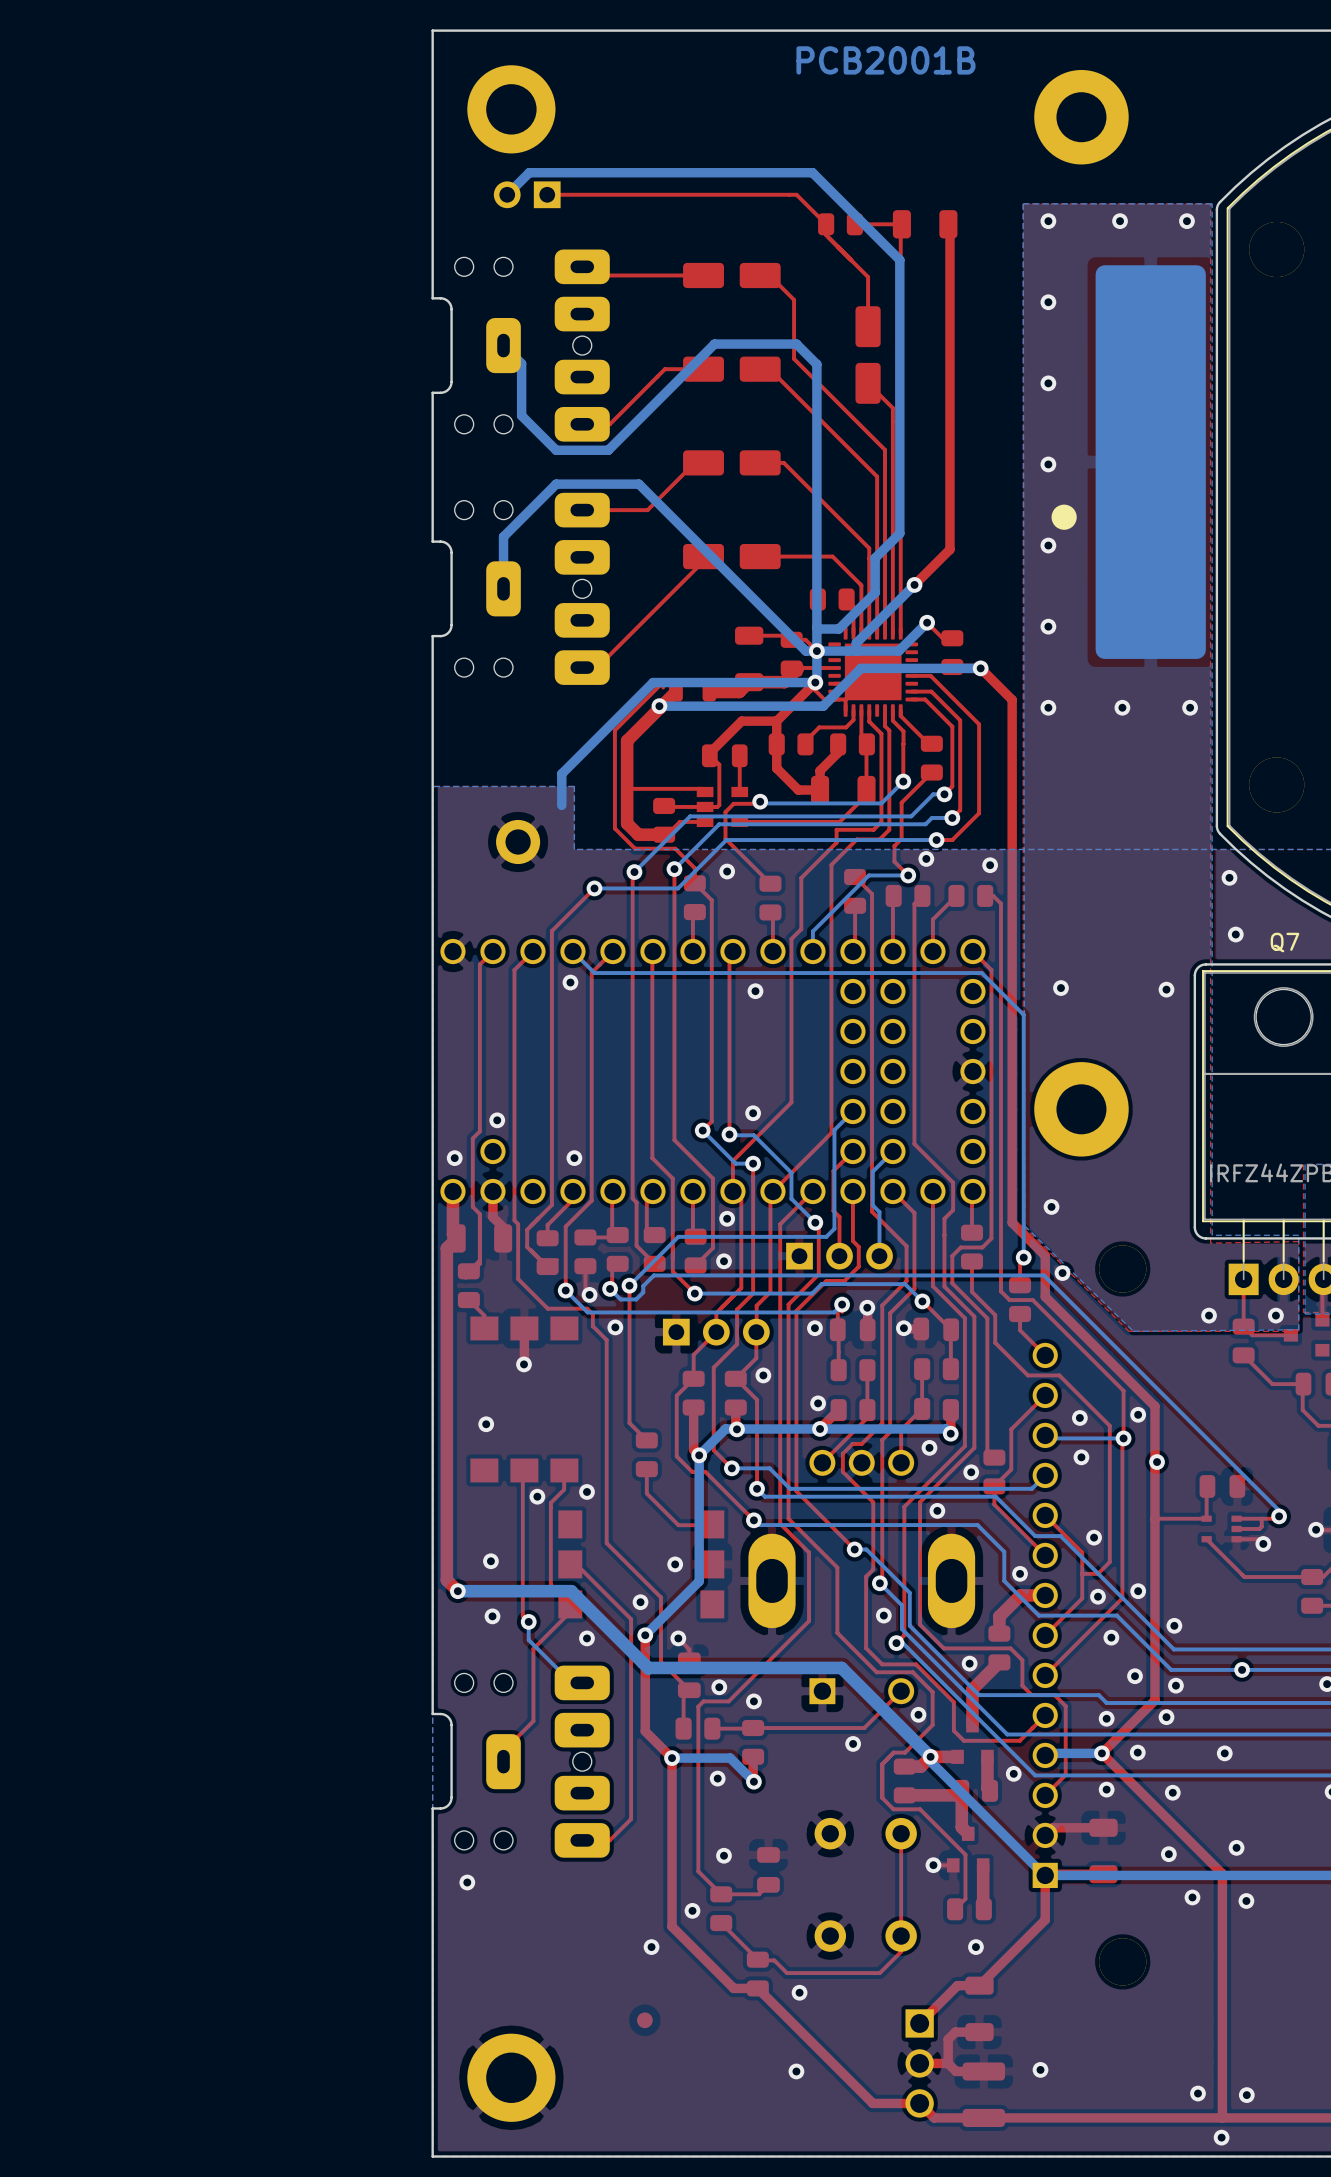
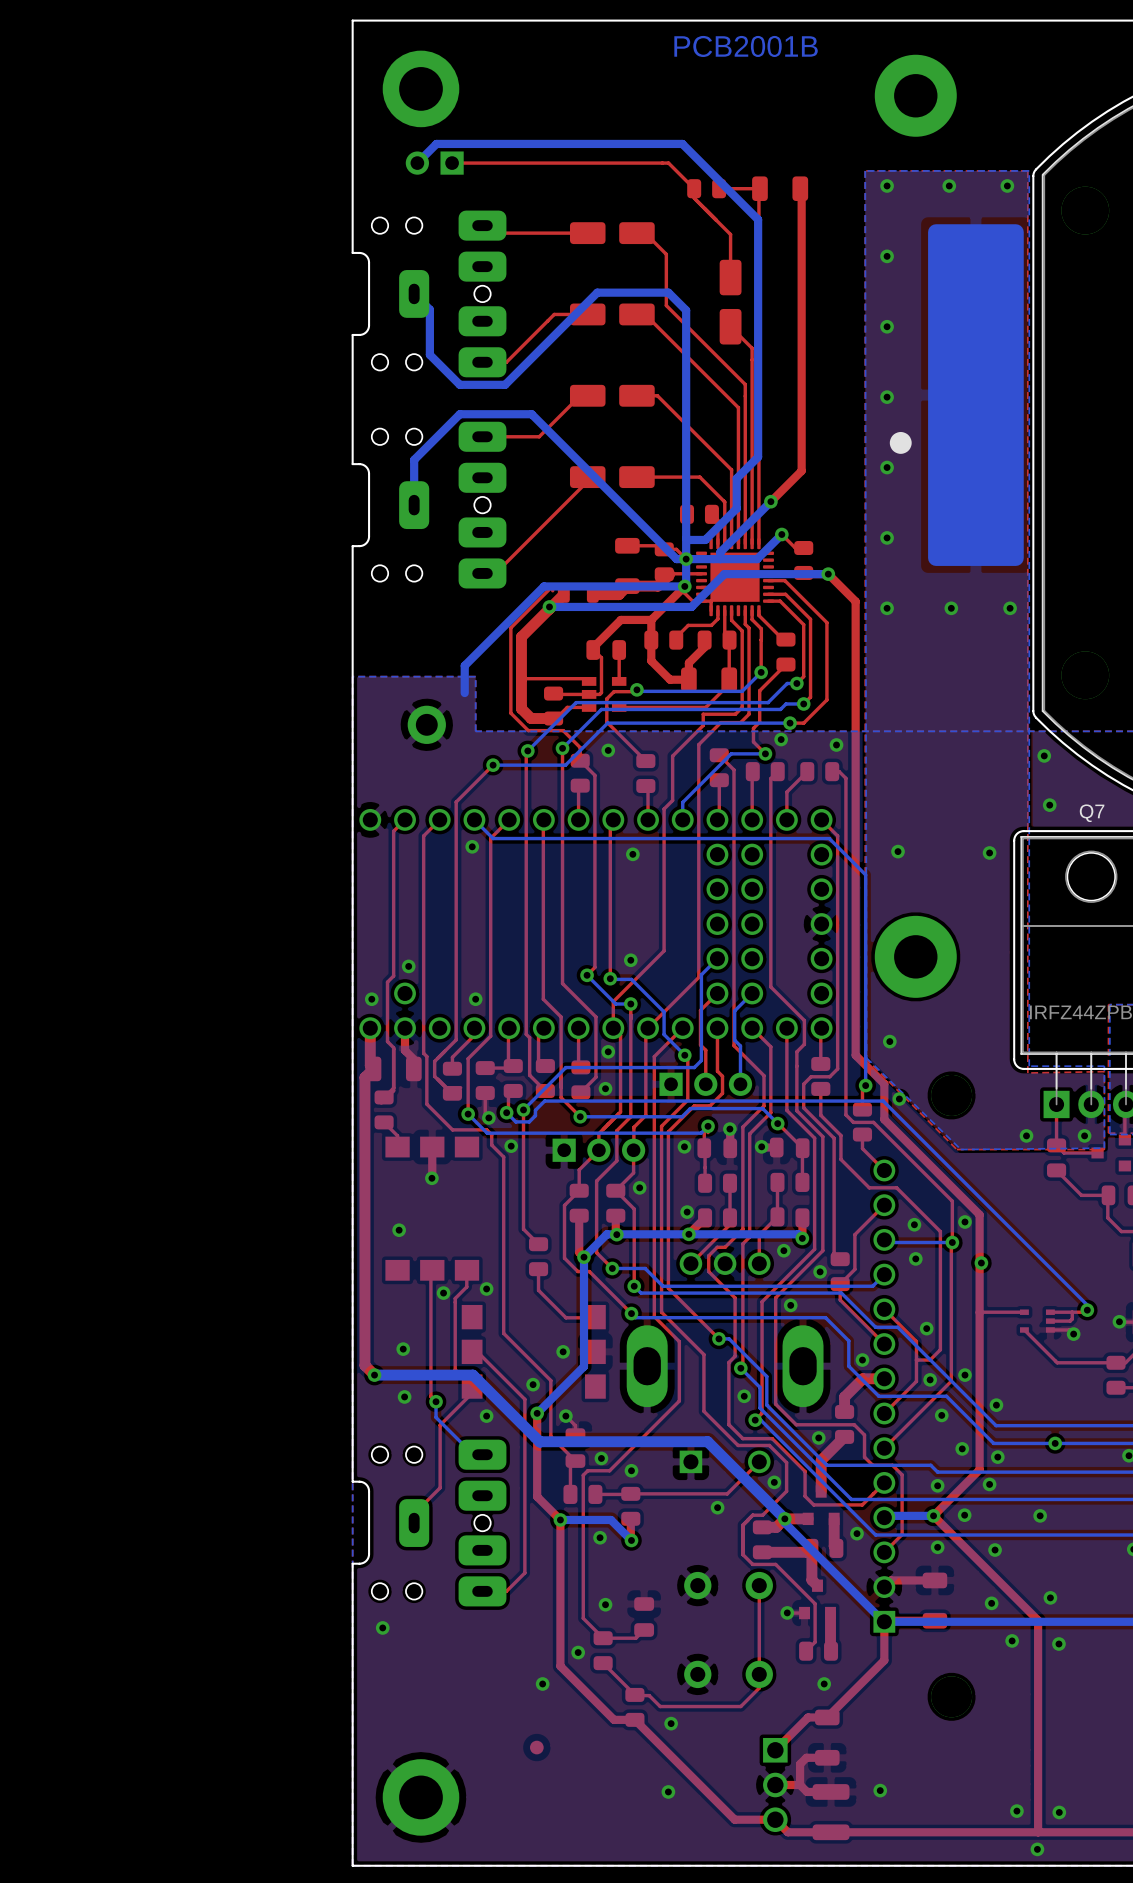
top track: (1207, 1486) (1206, 1518) -> none
part: (1222, 1486) -> none

